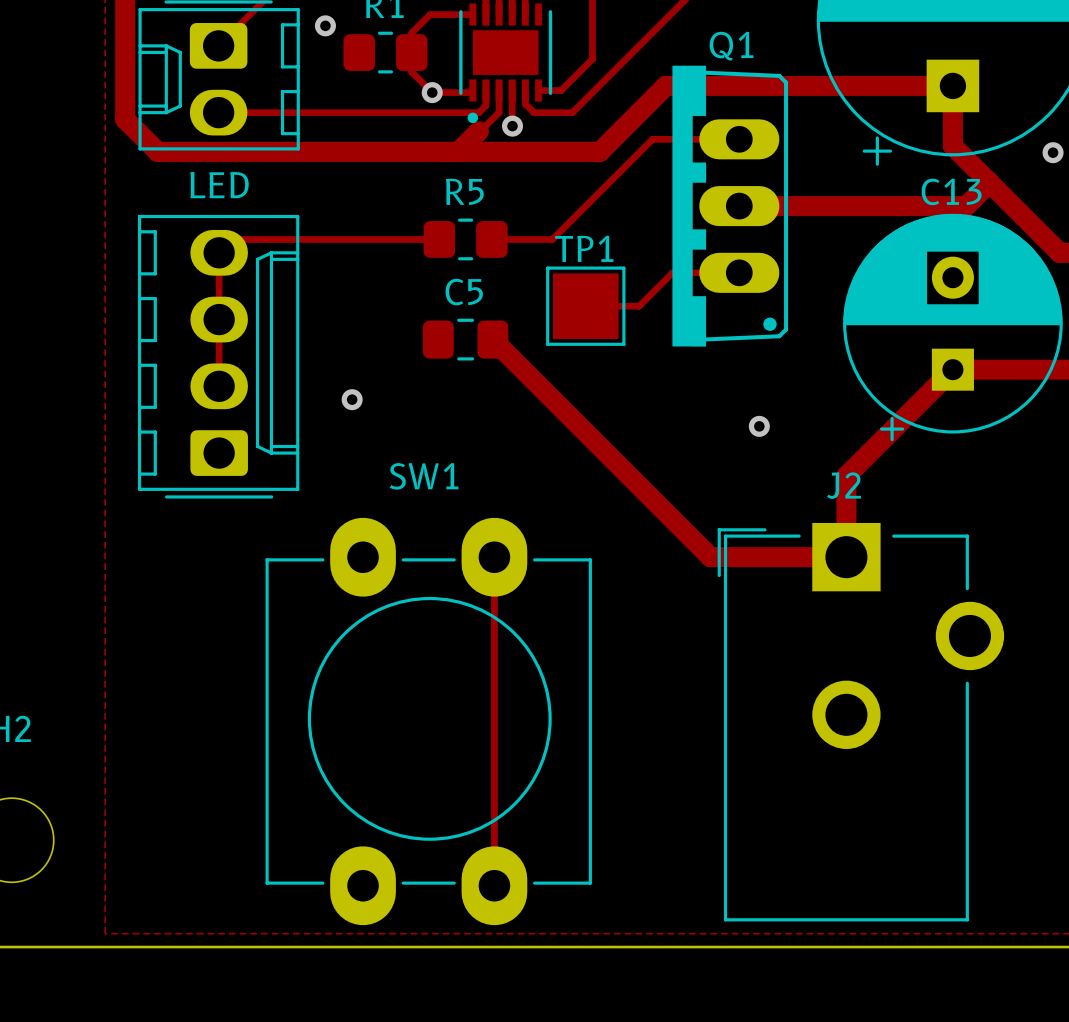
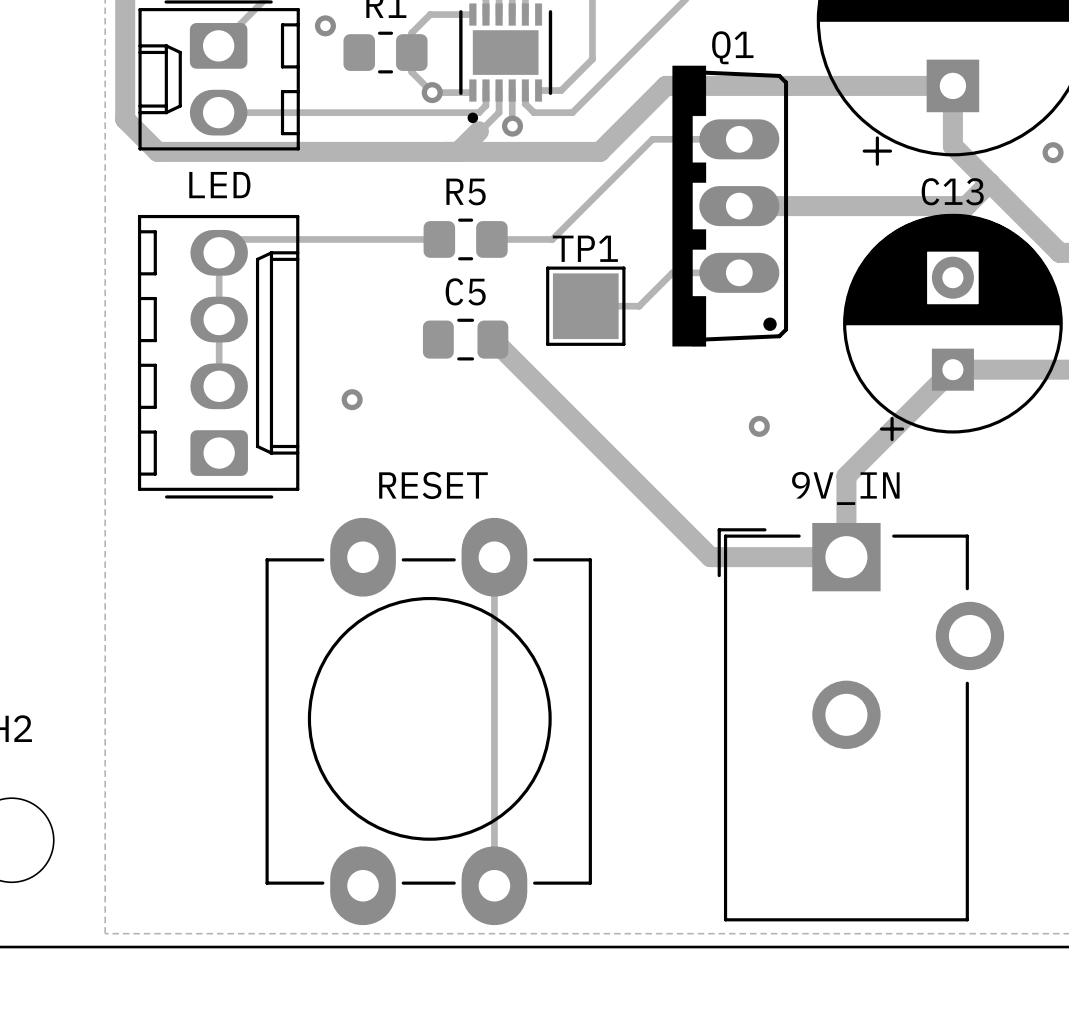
SW1 name: SW1 (424, 476) -> none
SW1 value: none -> RESET (433, 485)
J2 name: J2 (844, 485) -> none
J2 value: none -> 9V_IN (845, 488)

